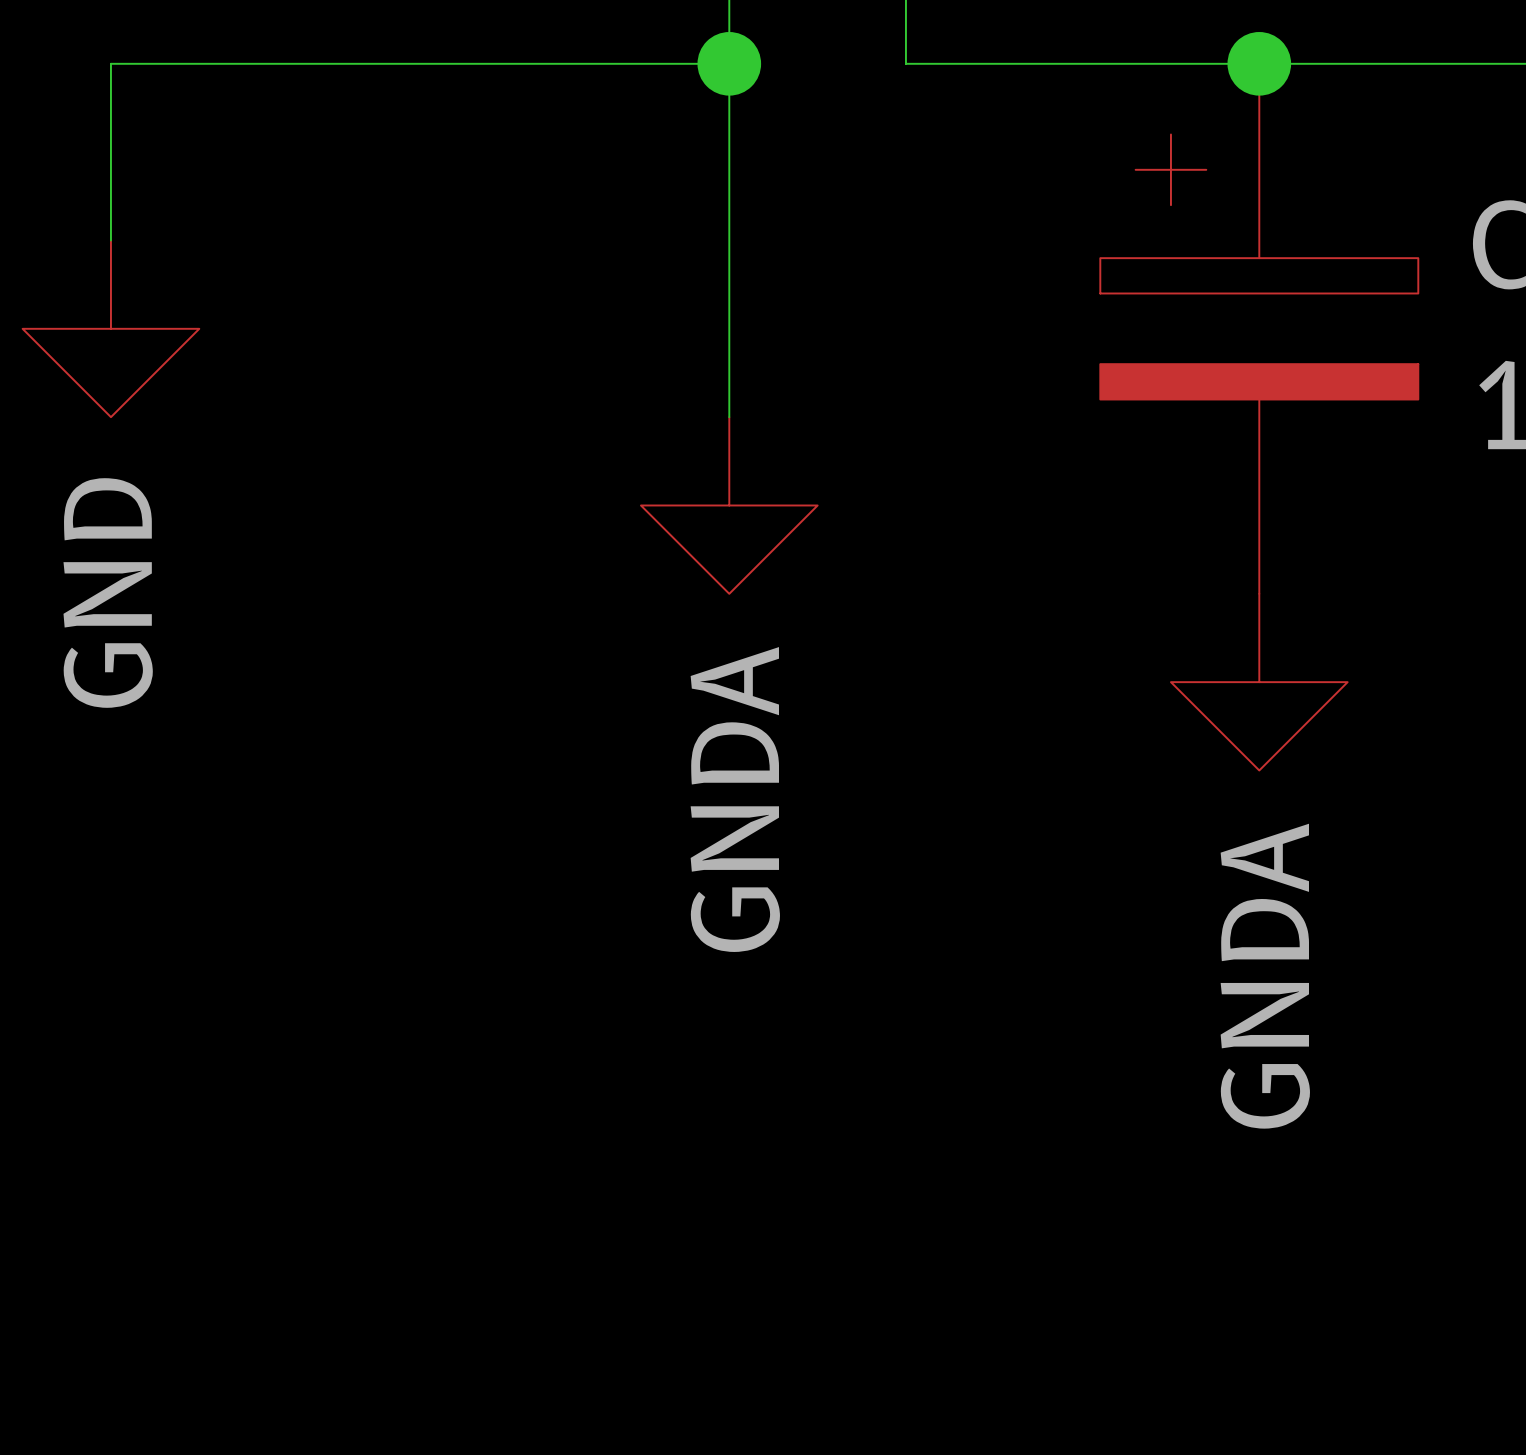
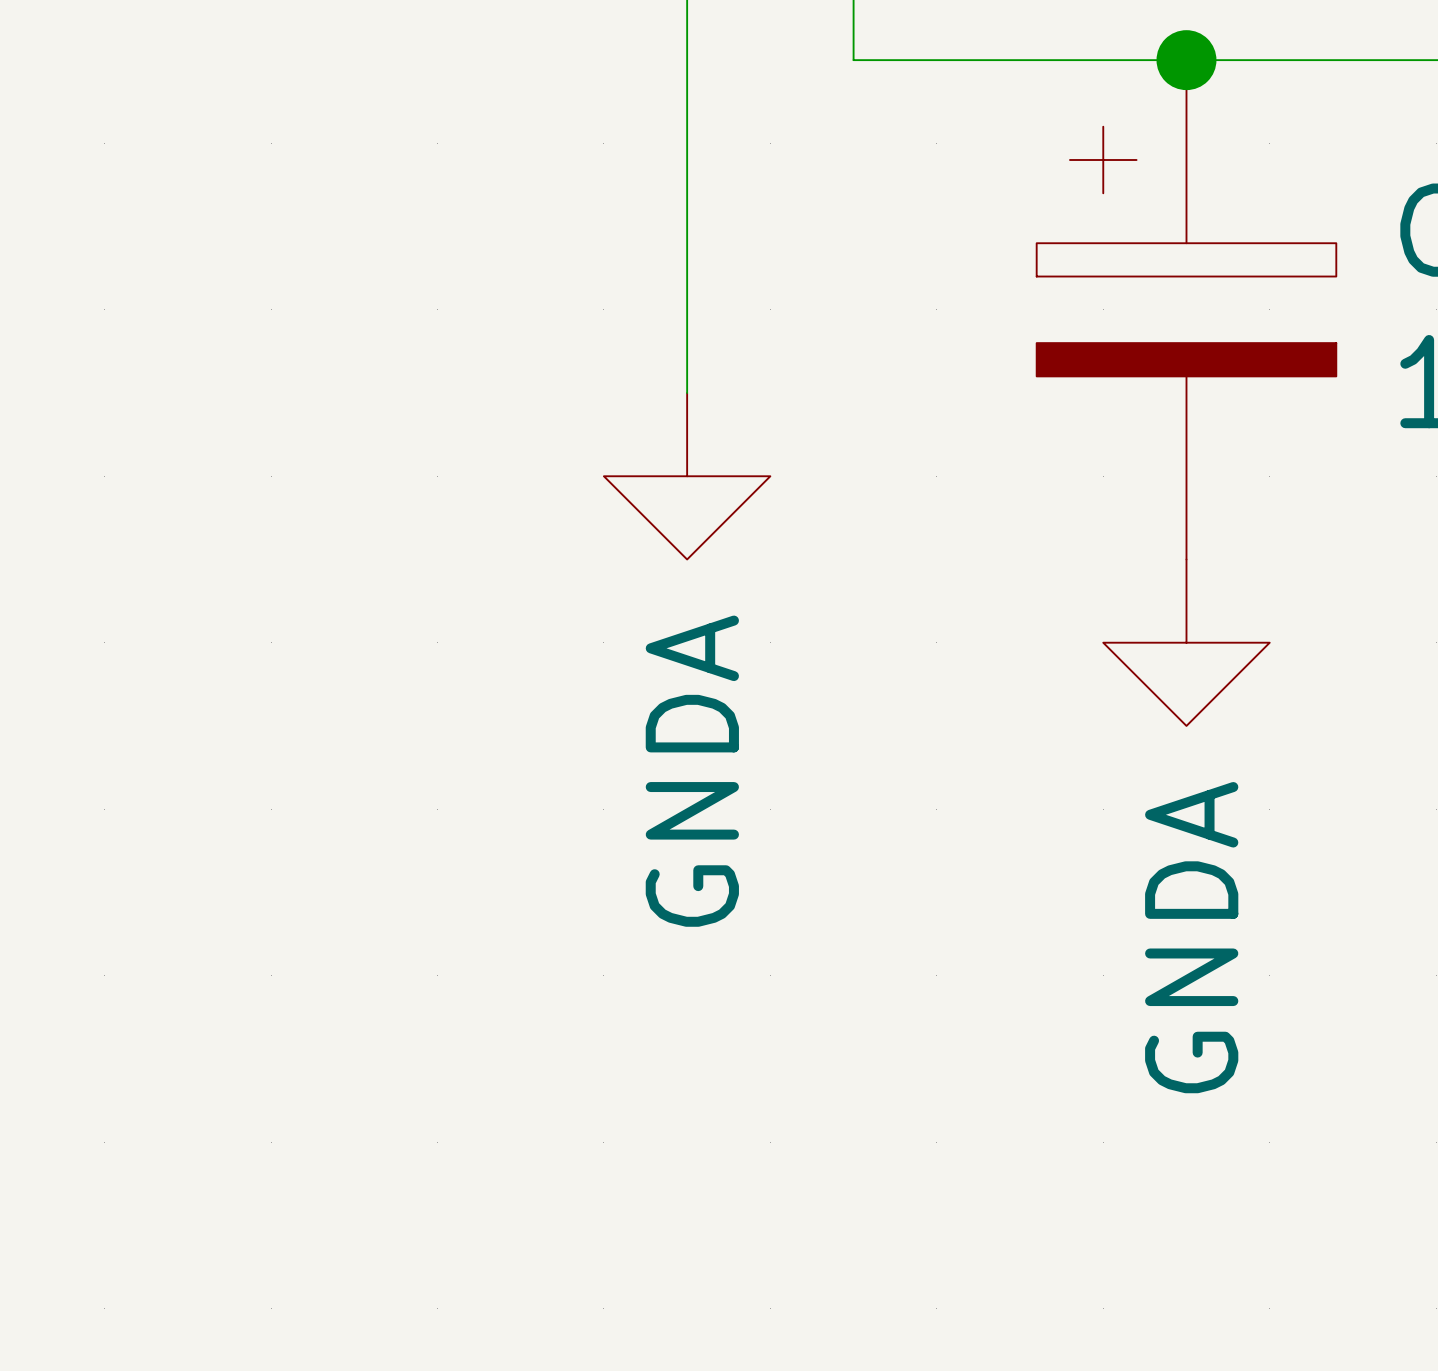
wire: (729, 63) (110, 63) (110, 240) -> none
junction: (729, 63) -> none
power symbol: GND (110, 328) -> none

